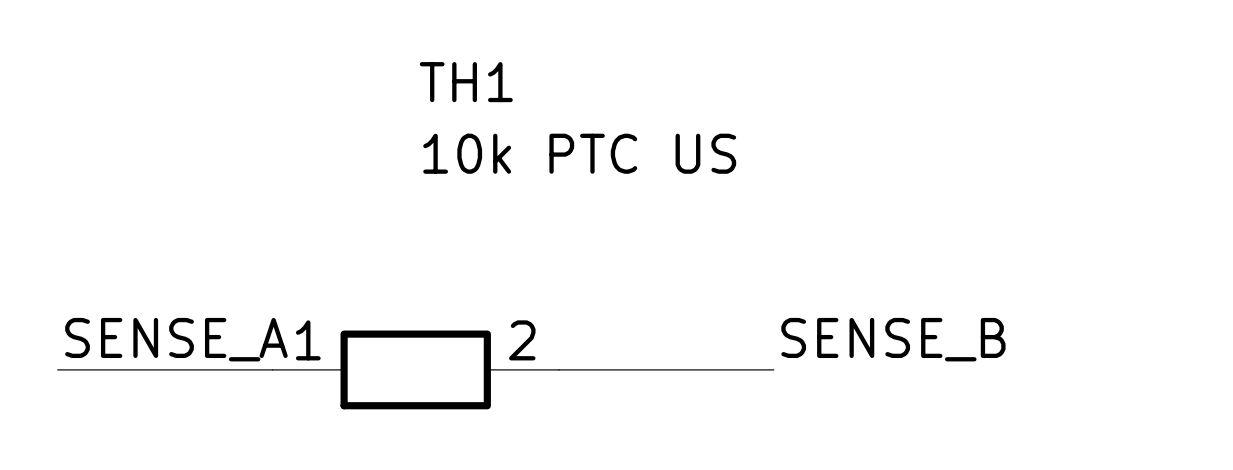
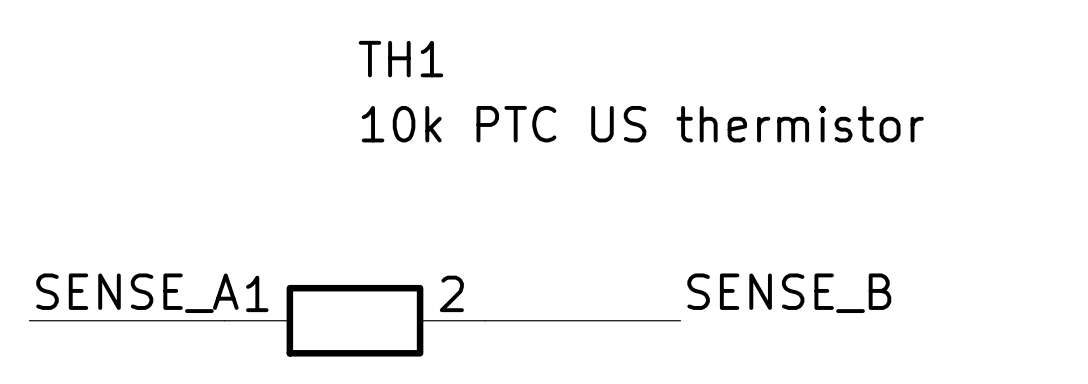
TH1 value: 10k PTC US (579, 153) -> 10k PTC US thermistor (642, 124)

